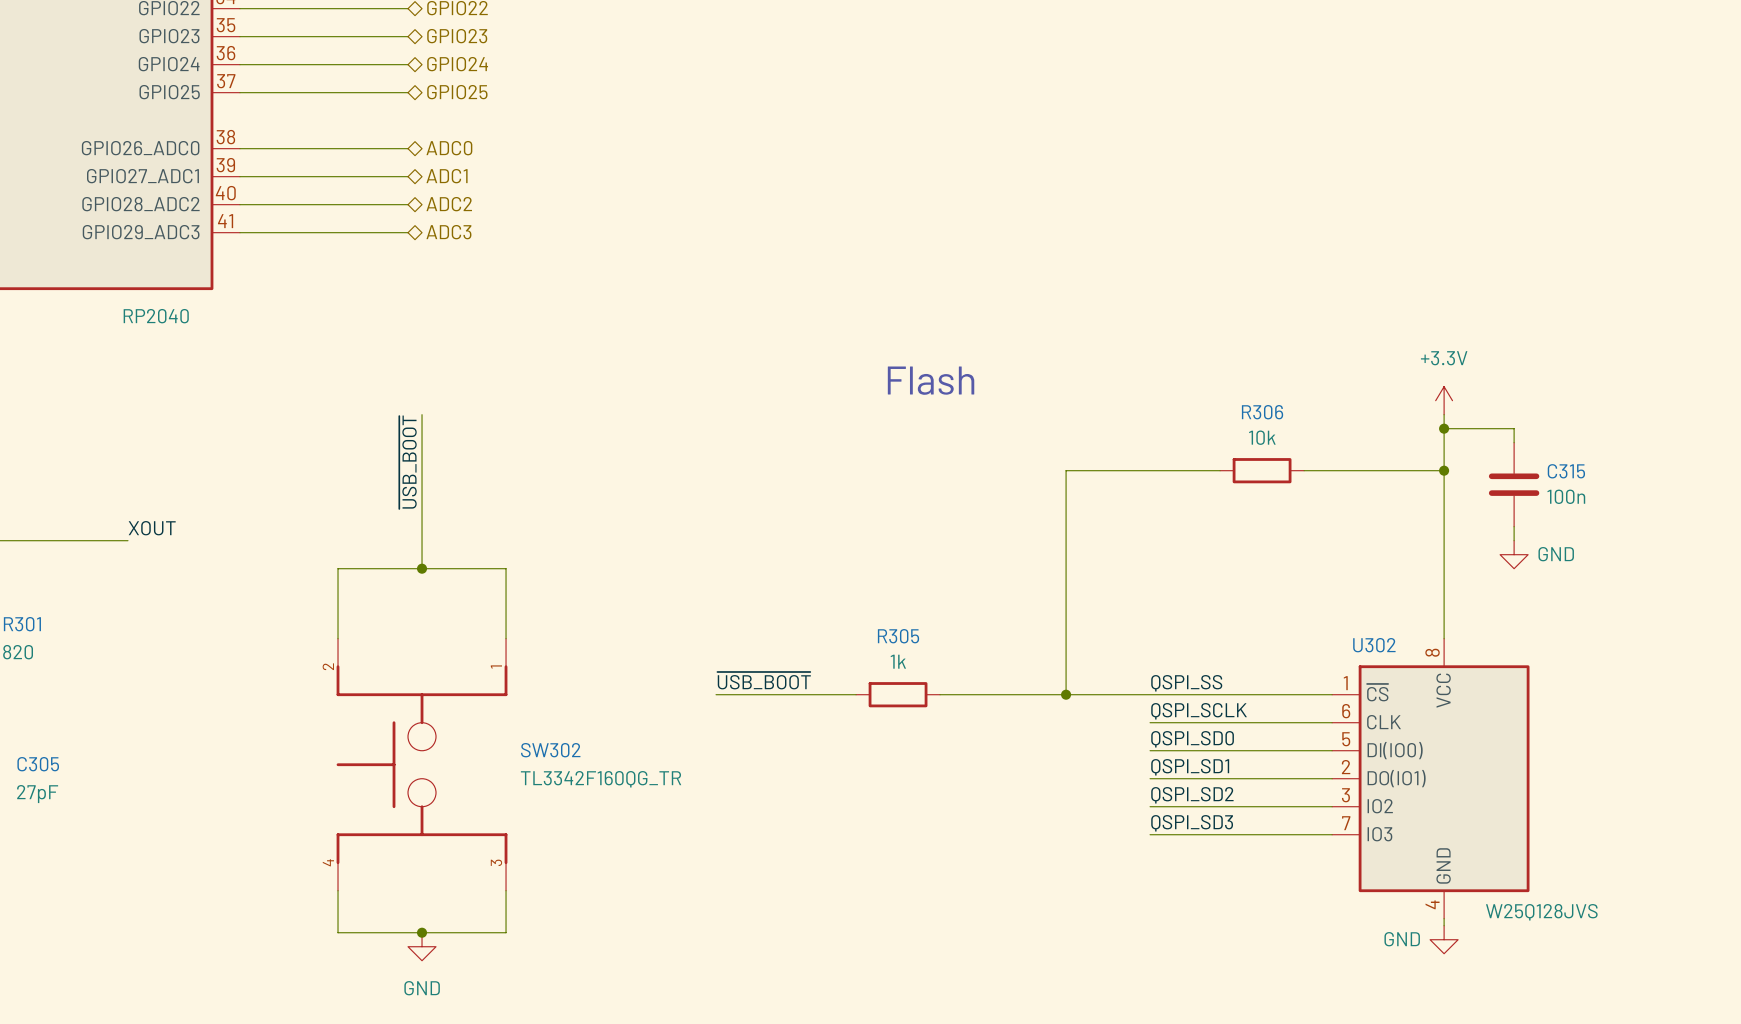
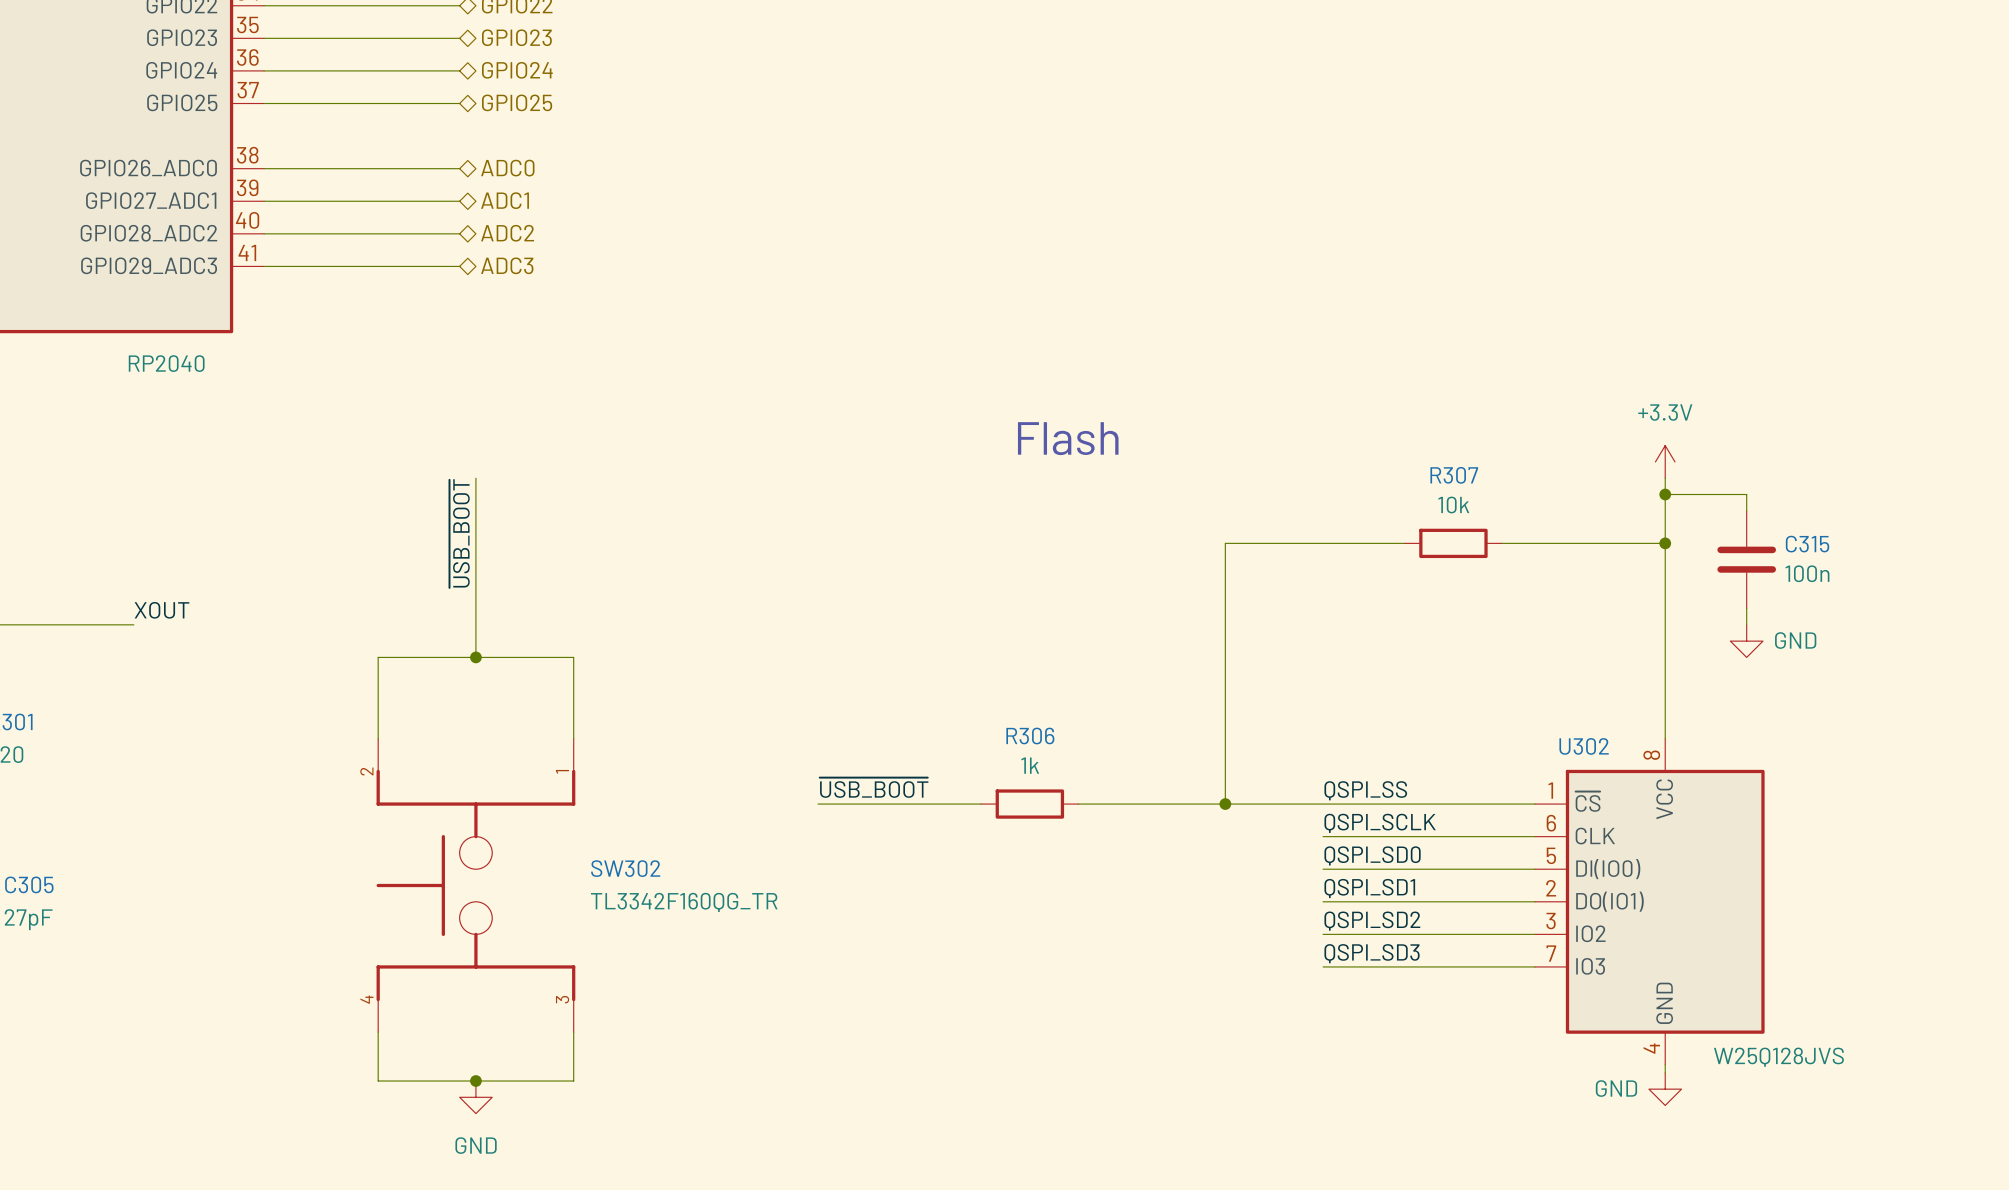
R306 name: R306 (1262, 412) -> R307 (1454, 475)
R305 name: R305 (898, 636) -> R306 (1030, 736)

